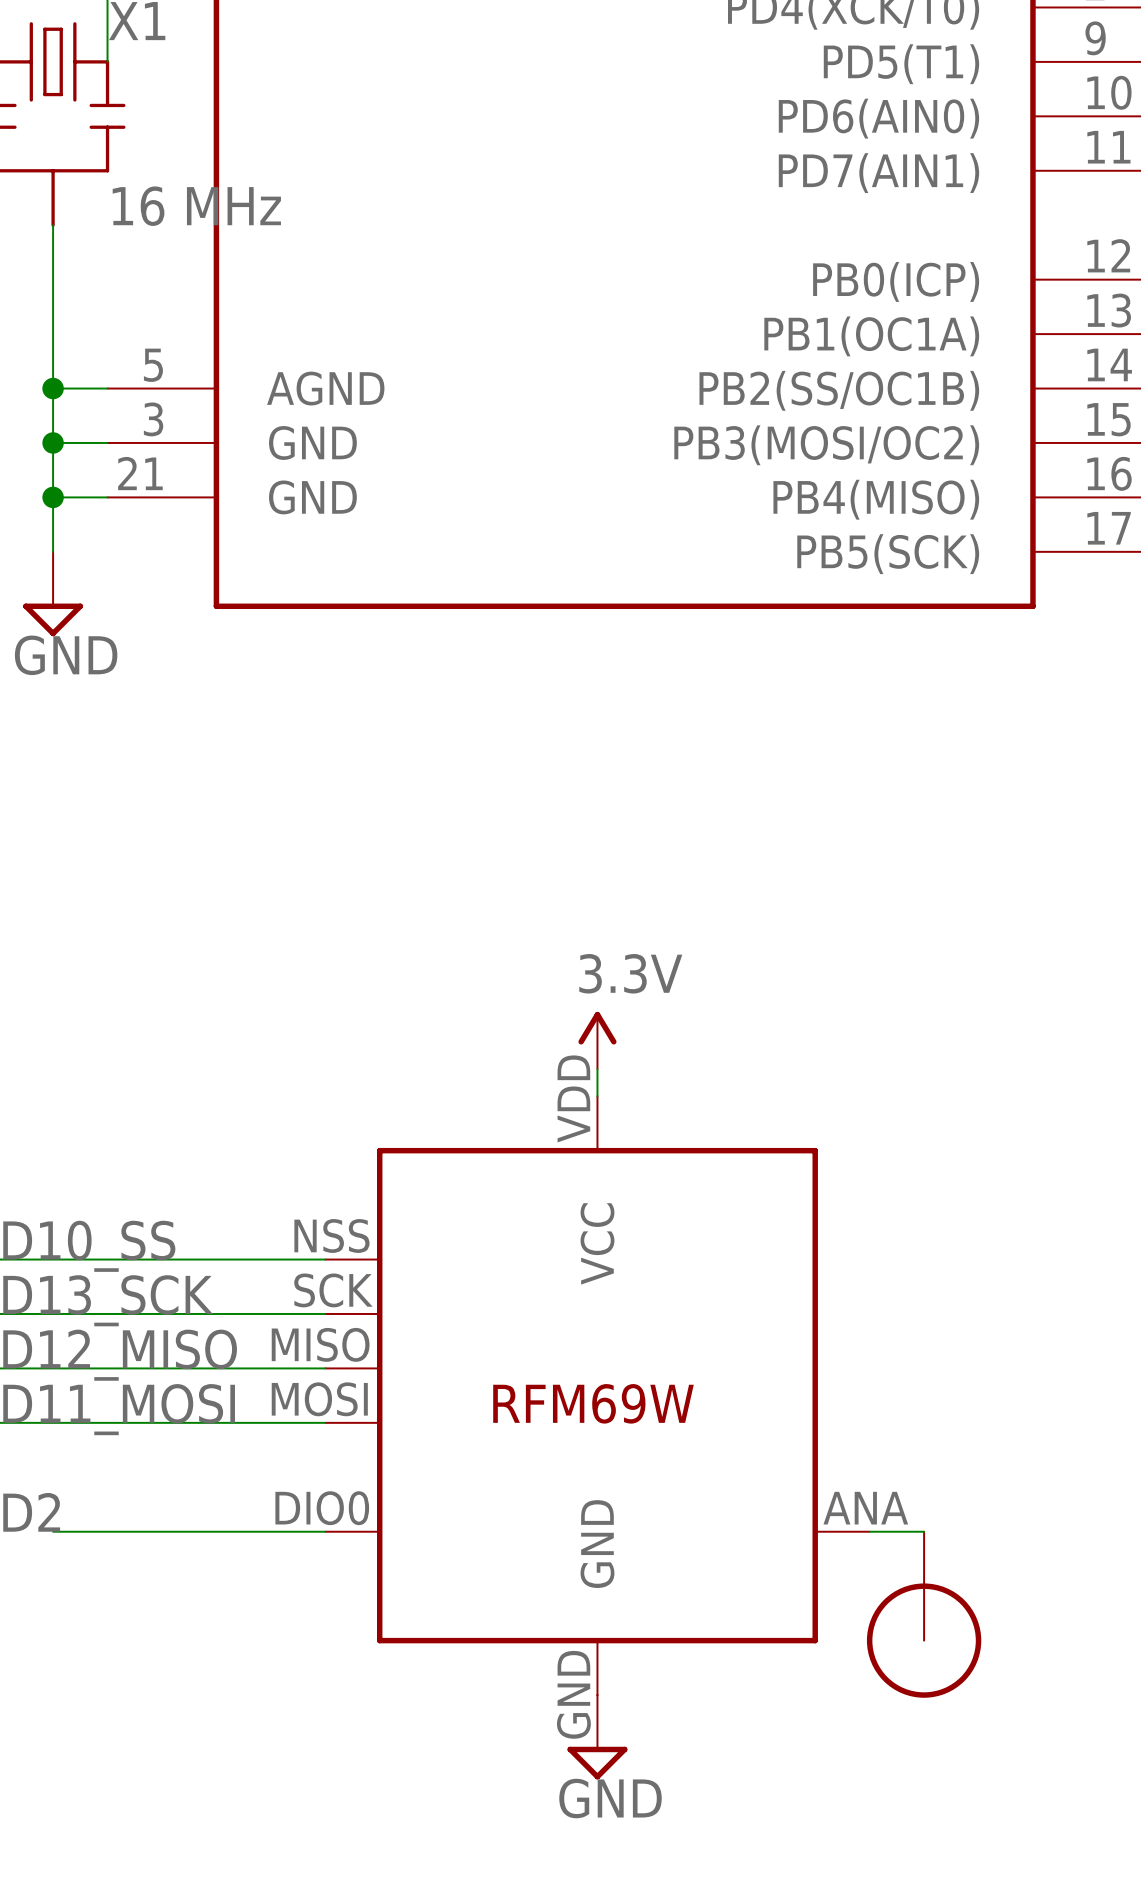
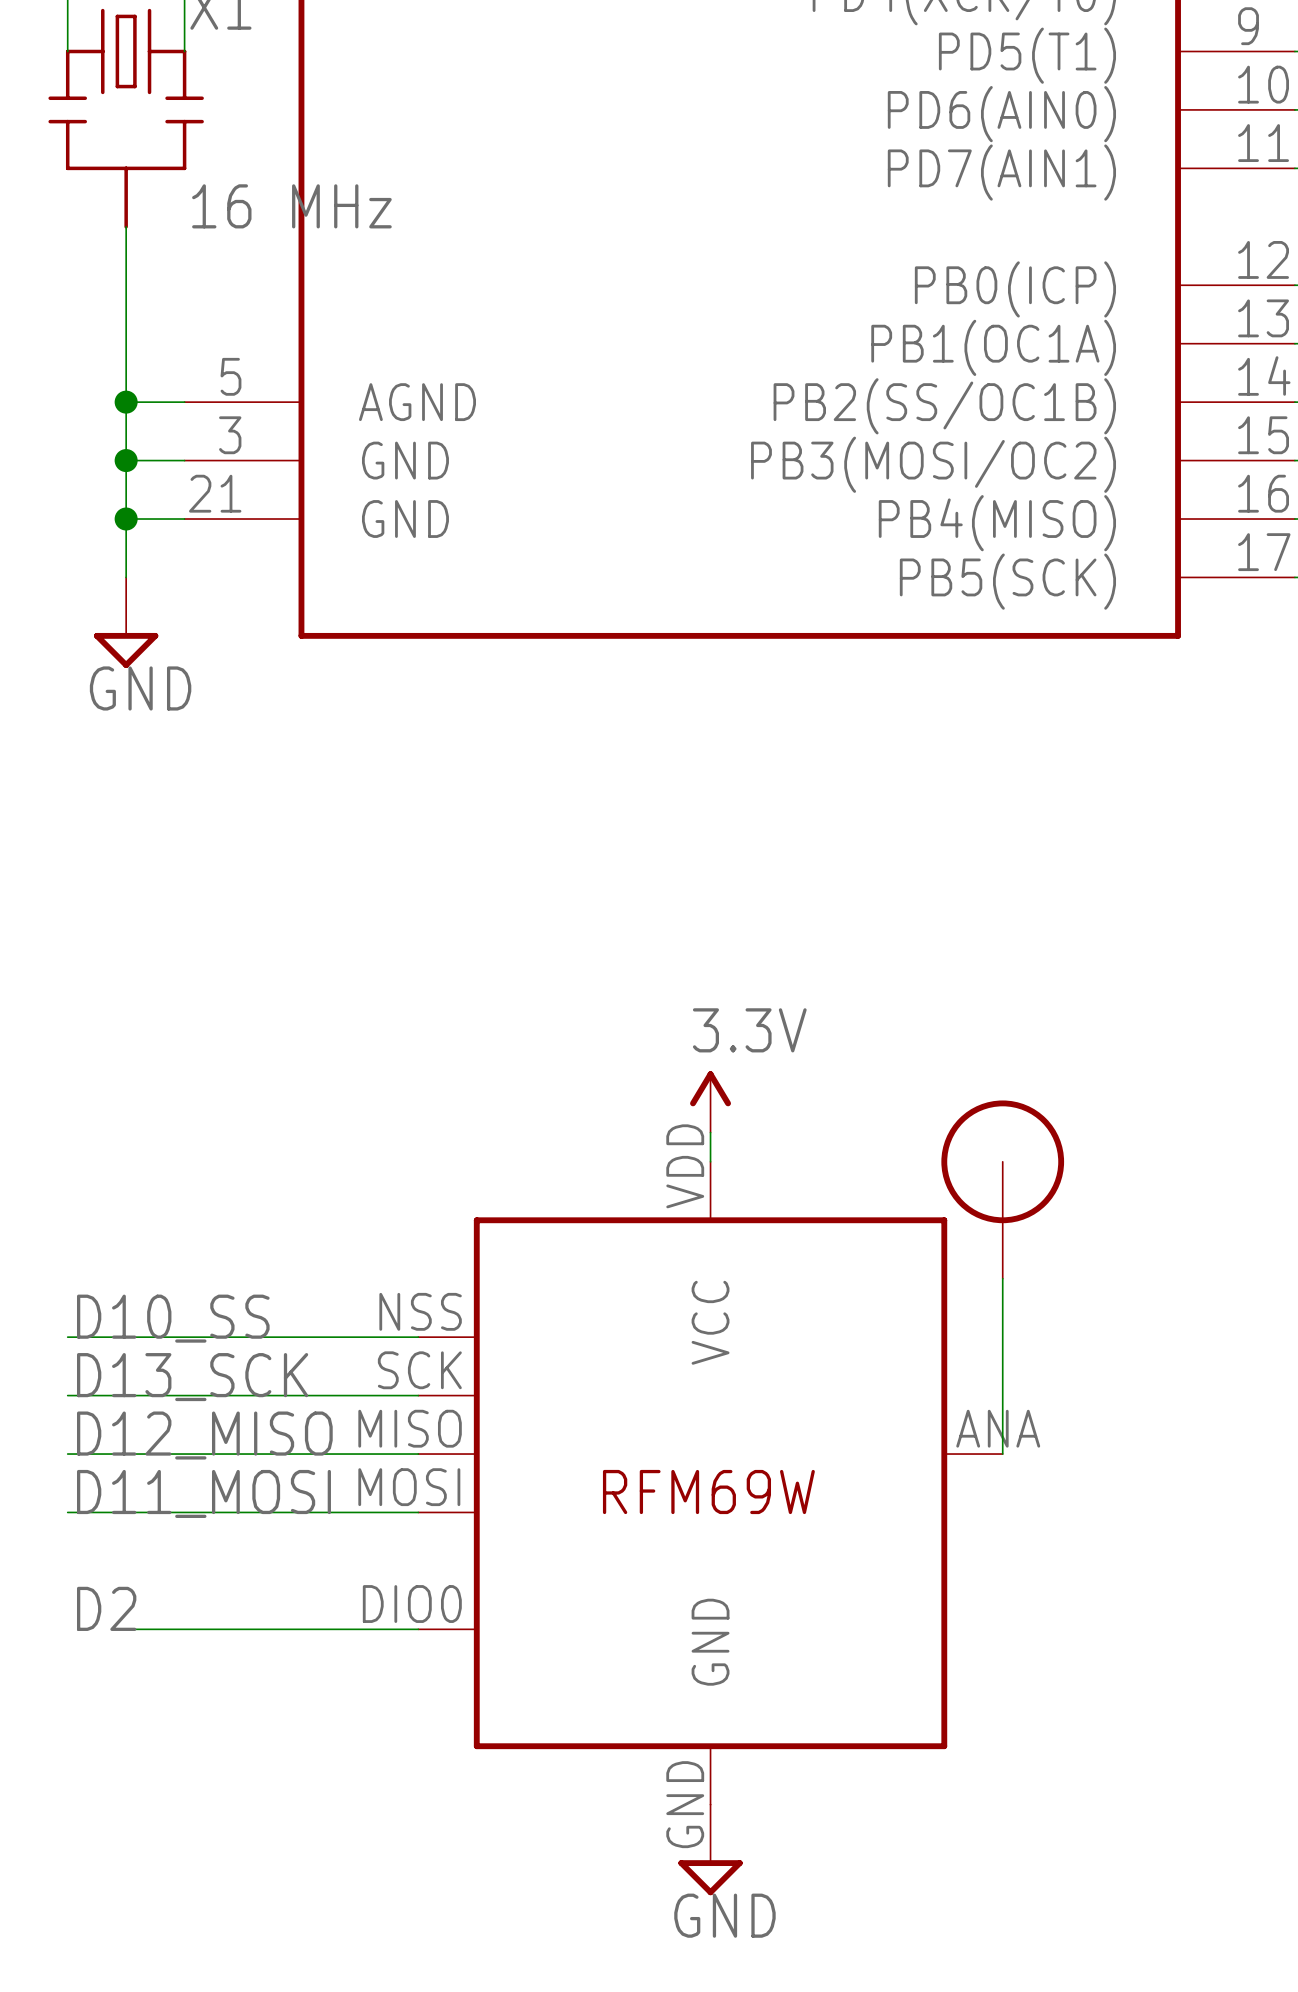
part symbol: [325, 1096, 870, 1696] -> [418, 1161, 1003, 1805]
wire: none -> (1002, 1278) (1002, 1454)
wire: (869, 1531) (924, 1531) -> none
part position: (924, 1614) -> (1002, 1189)
part rotation: 0° (924, 1640) -> 180° (1002, 1161)

